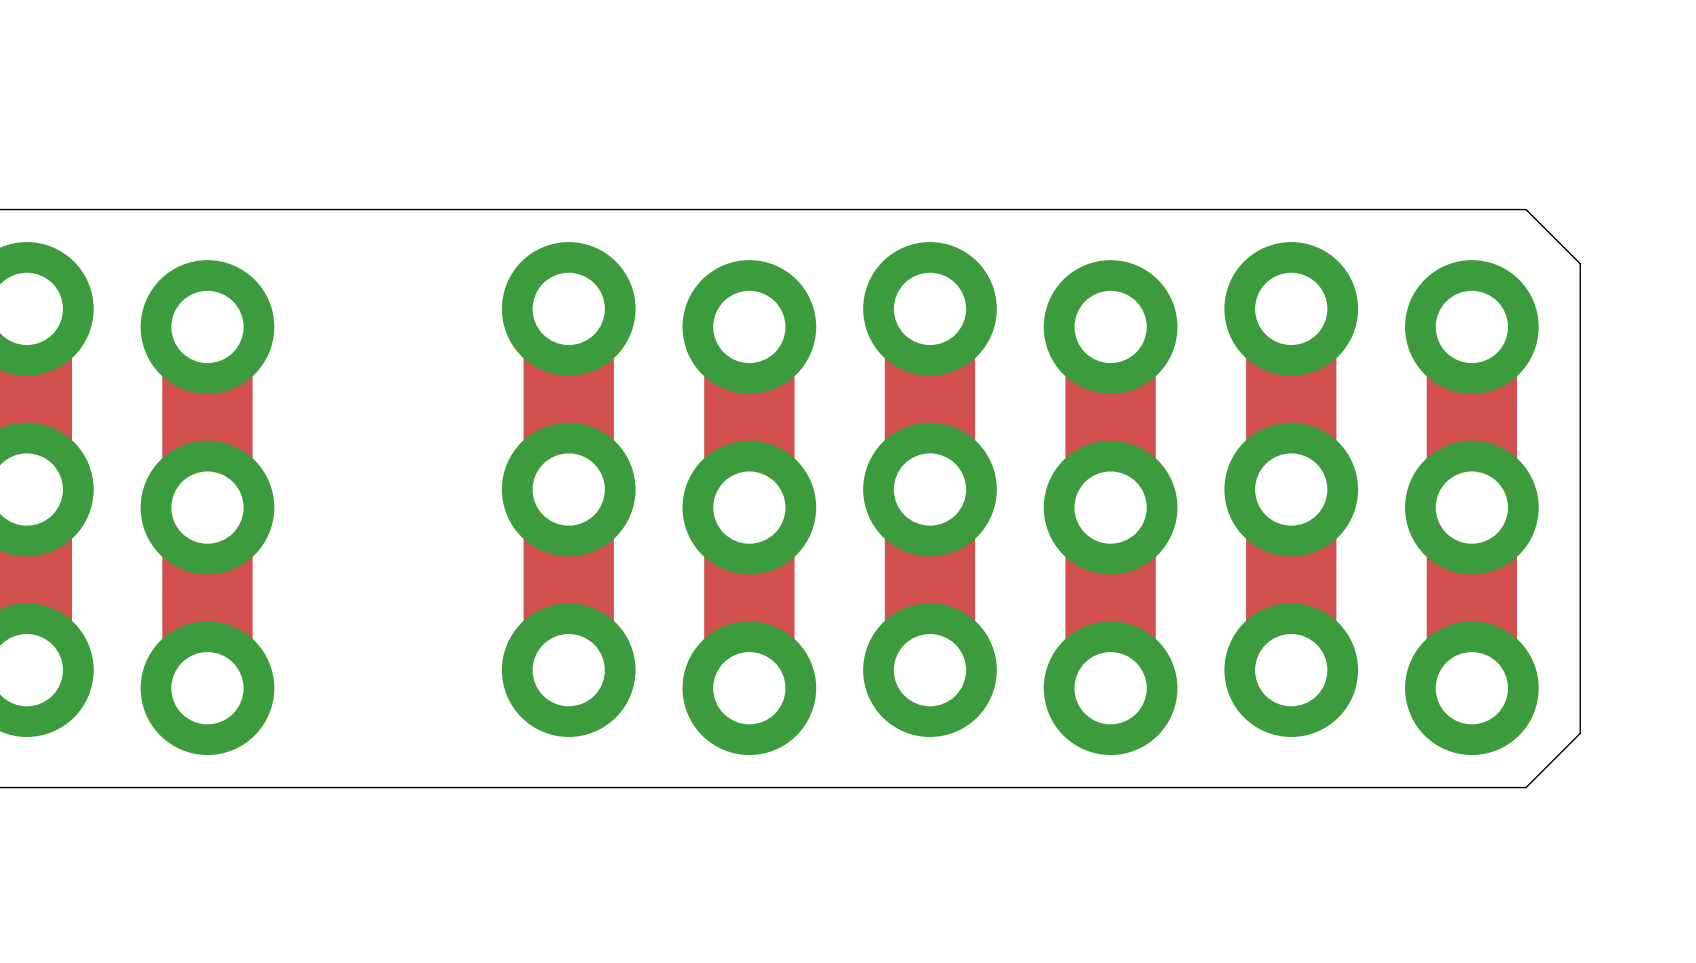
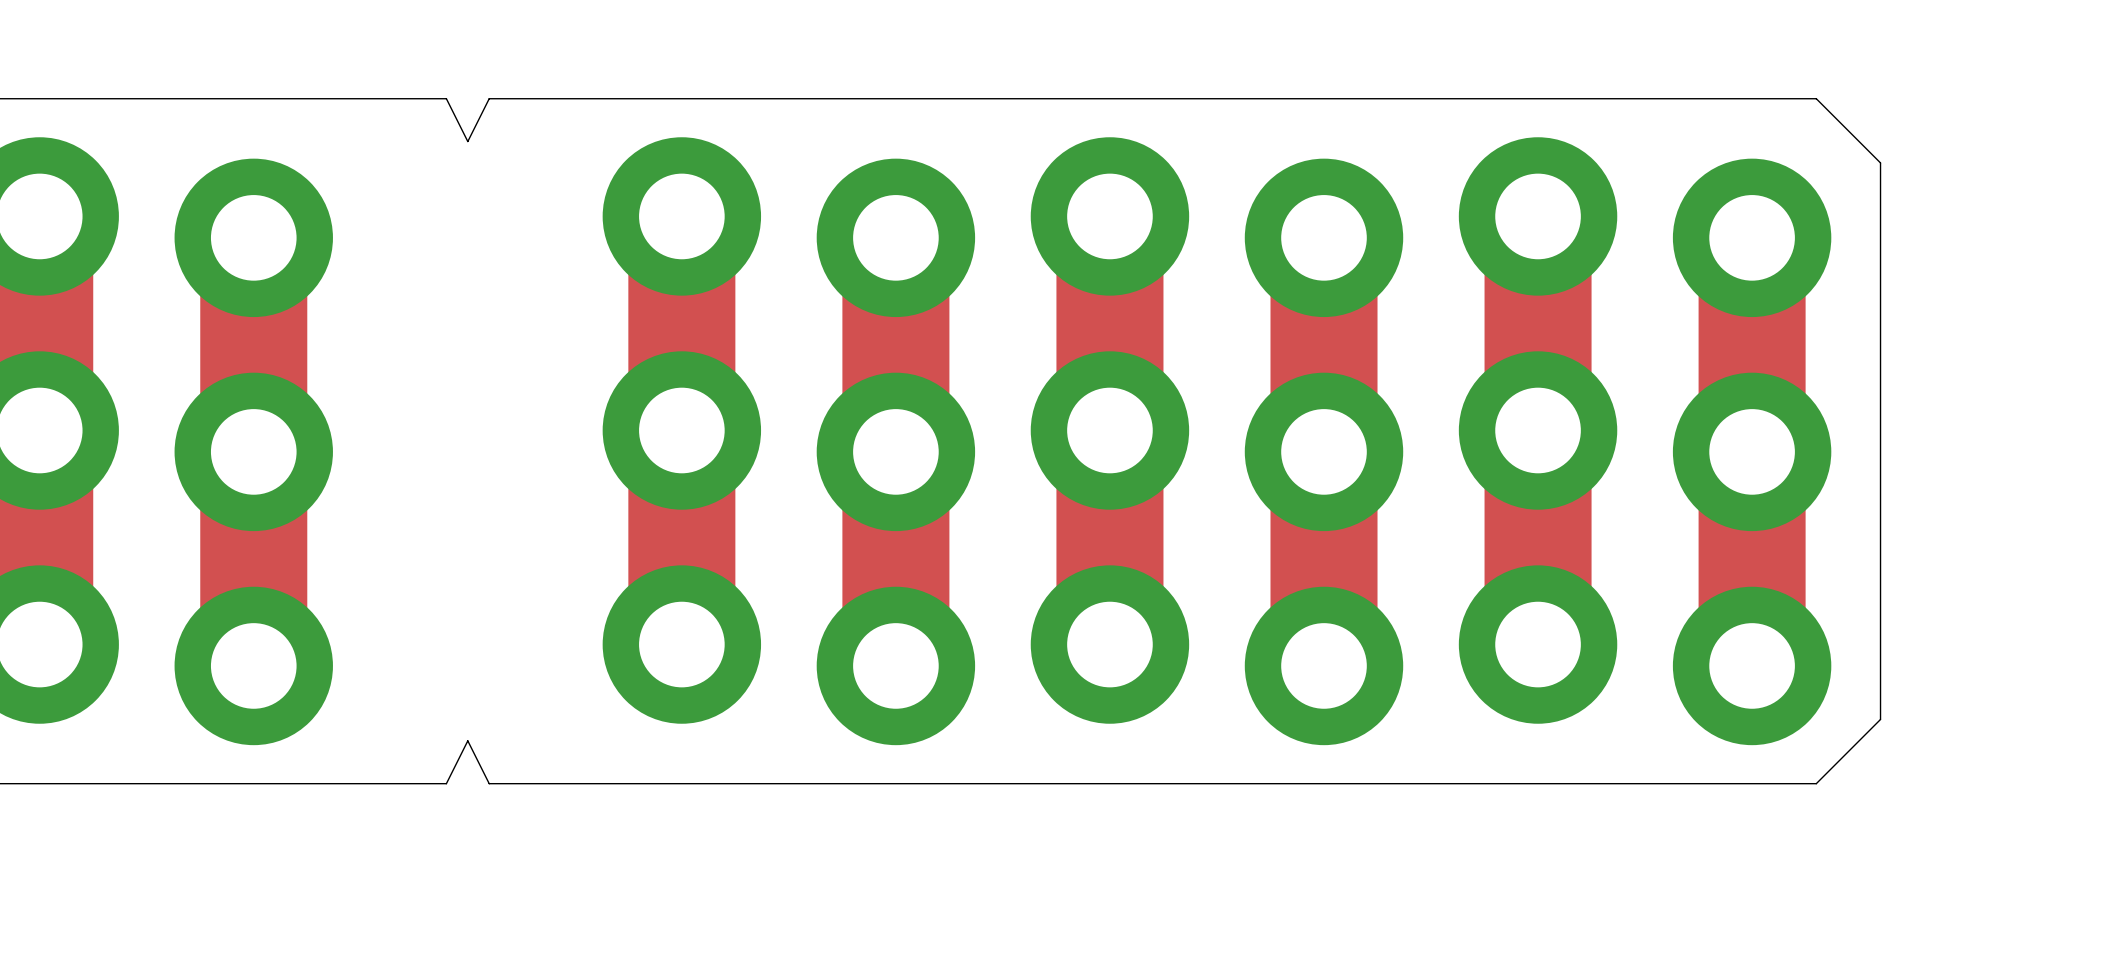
board edge: (370, 209) (406, 209) -> (446, 98) (467, 141) (489, 98)
board edge: (370, 787) (406, 787) -> (446, 783) (467, 740) (489, 783)

